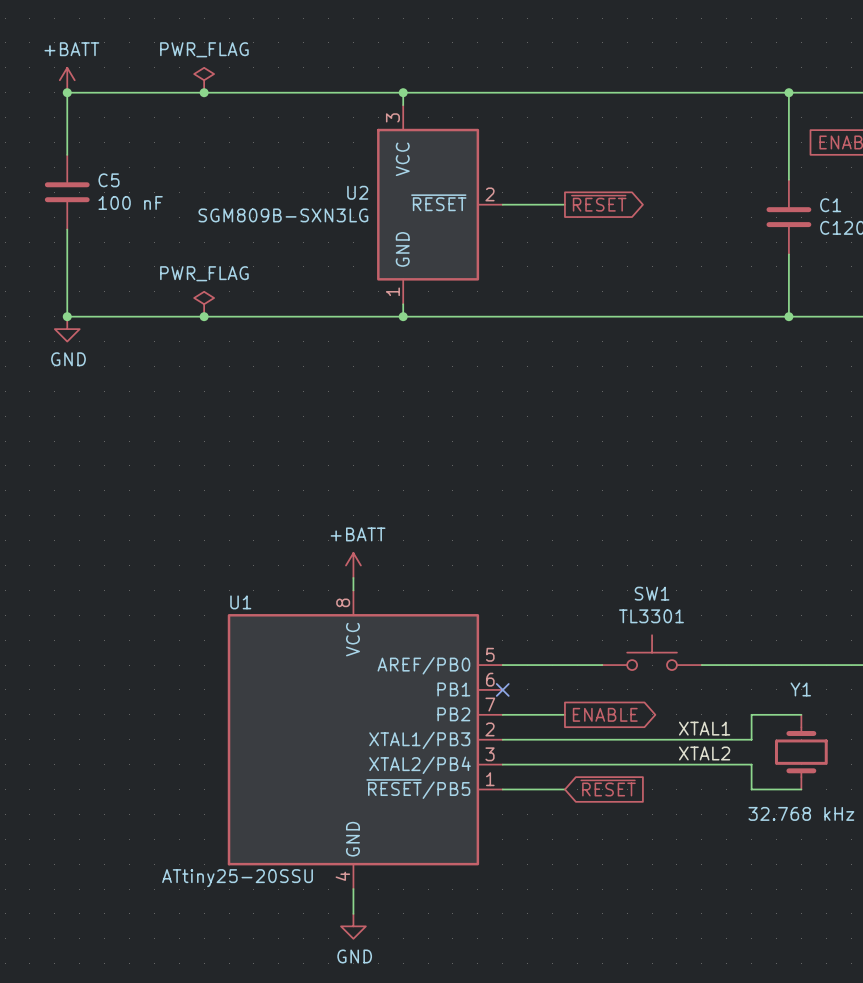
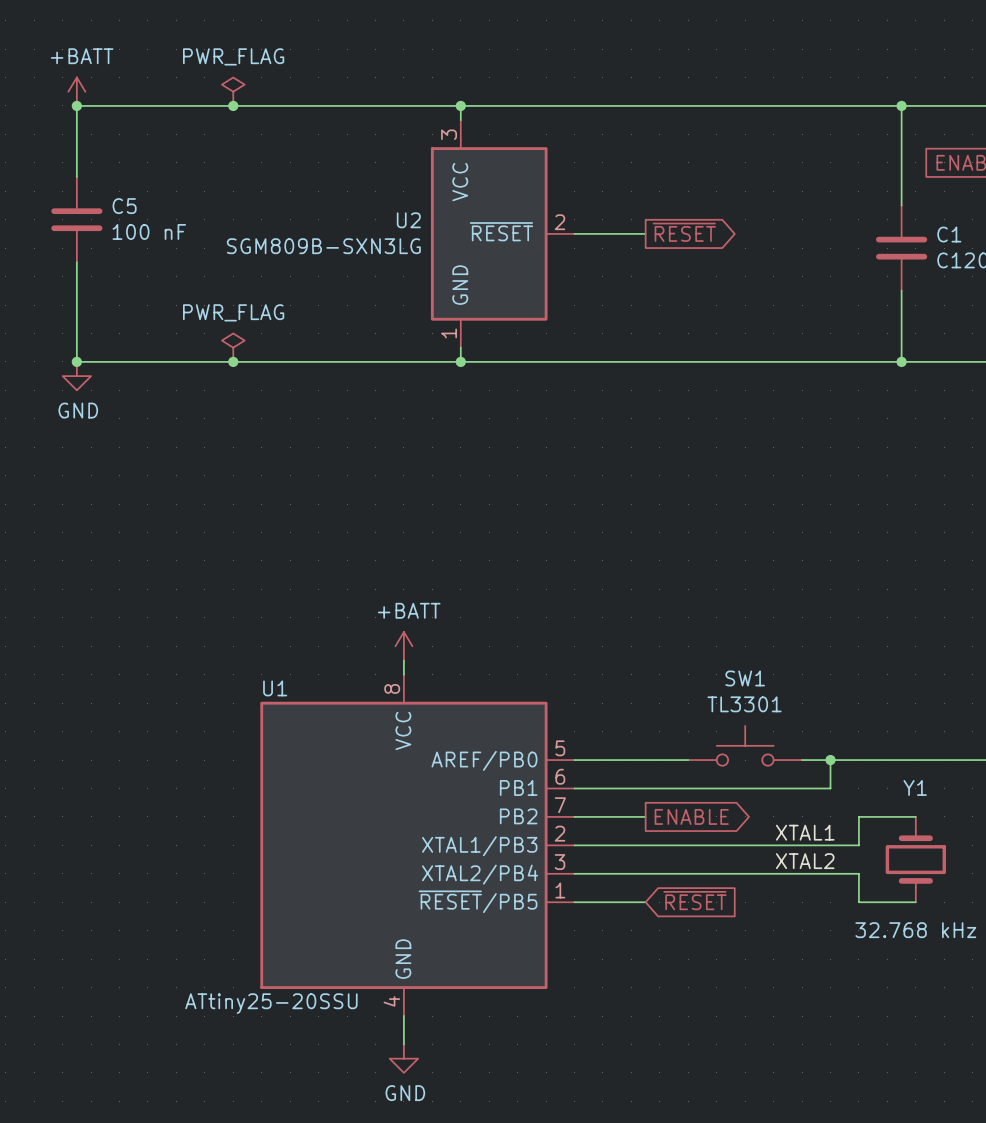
wire: none -> (830, 760) (830, 788) (574, 788)
junction: none -> (830, 760)
no-connect mark: (502, 689) -> none

